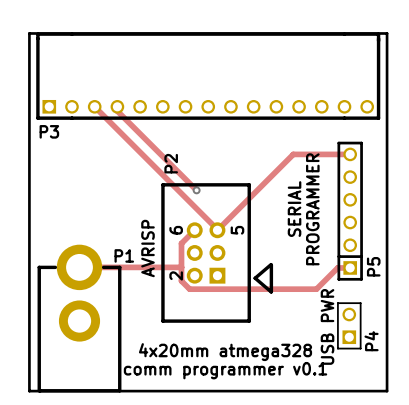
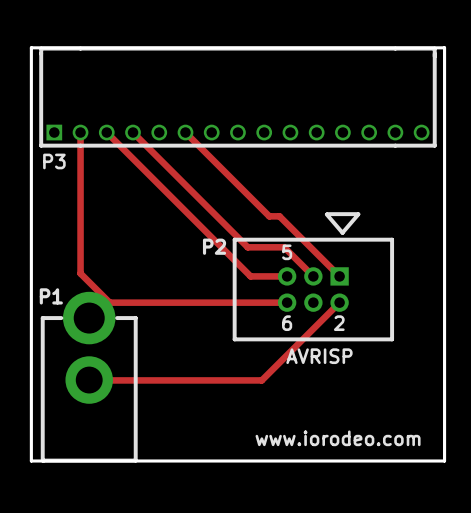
track: none -> (80, 132) (80, 273) (109, 302)
track: (117, 106) (117, 111) (196, 190) -> (133, 132) (247, 247) (284, 247) (313, 276)
track: none -> (185, 132) (269, 216) (279, 216) (339, 276)
track: (350, 154) (293, 154) (217, 229) -> (287, 276) (250, 276) (248, 274)
P2 name position: P2 (171, 163) -> P2 (214, 246)
via: (196, 190) -> none
text: SERIAL (294, 209) -> none
text: PROGRAMMER (312, 209) -> none
P5: (350, 211) -> none
track: (194, 230) (181, 243) (181, 281) (189, 289) (316, 289) (337, 267) (350, 267) -> none
text rotation: 0° (147, 248) -> 90° clockwise (319, 356)
text position: AVRISP (147, 248) -> AVRISP (319, 356)
P2 rotation: 0° (217, 252) -> 90° counterclockwise (313, 276)
track: none -> (109, 302) (287, 302)
track: none -> (339, 302) (261, 380) (93, 380)
P1 name position: P1 (124, 255) -> P1 (51, 296)
track: (79, 267) (181, 267) -> none
P4: (349, 325) -> none
text: USB PWR (327, 326) -> none
text: 4x20mm atmega328 (225, 352) -> none
text: comm programmer v0.1 (225, 370) -> none
text: none -> www.iorodeo.com (338, 438)

